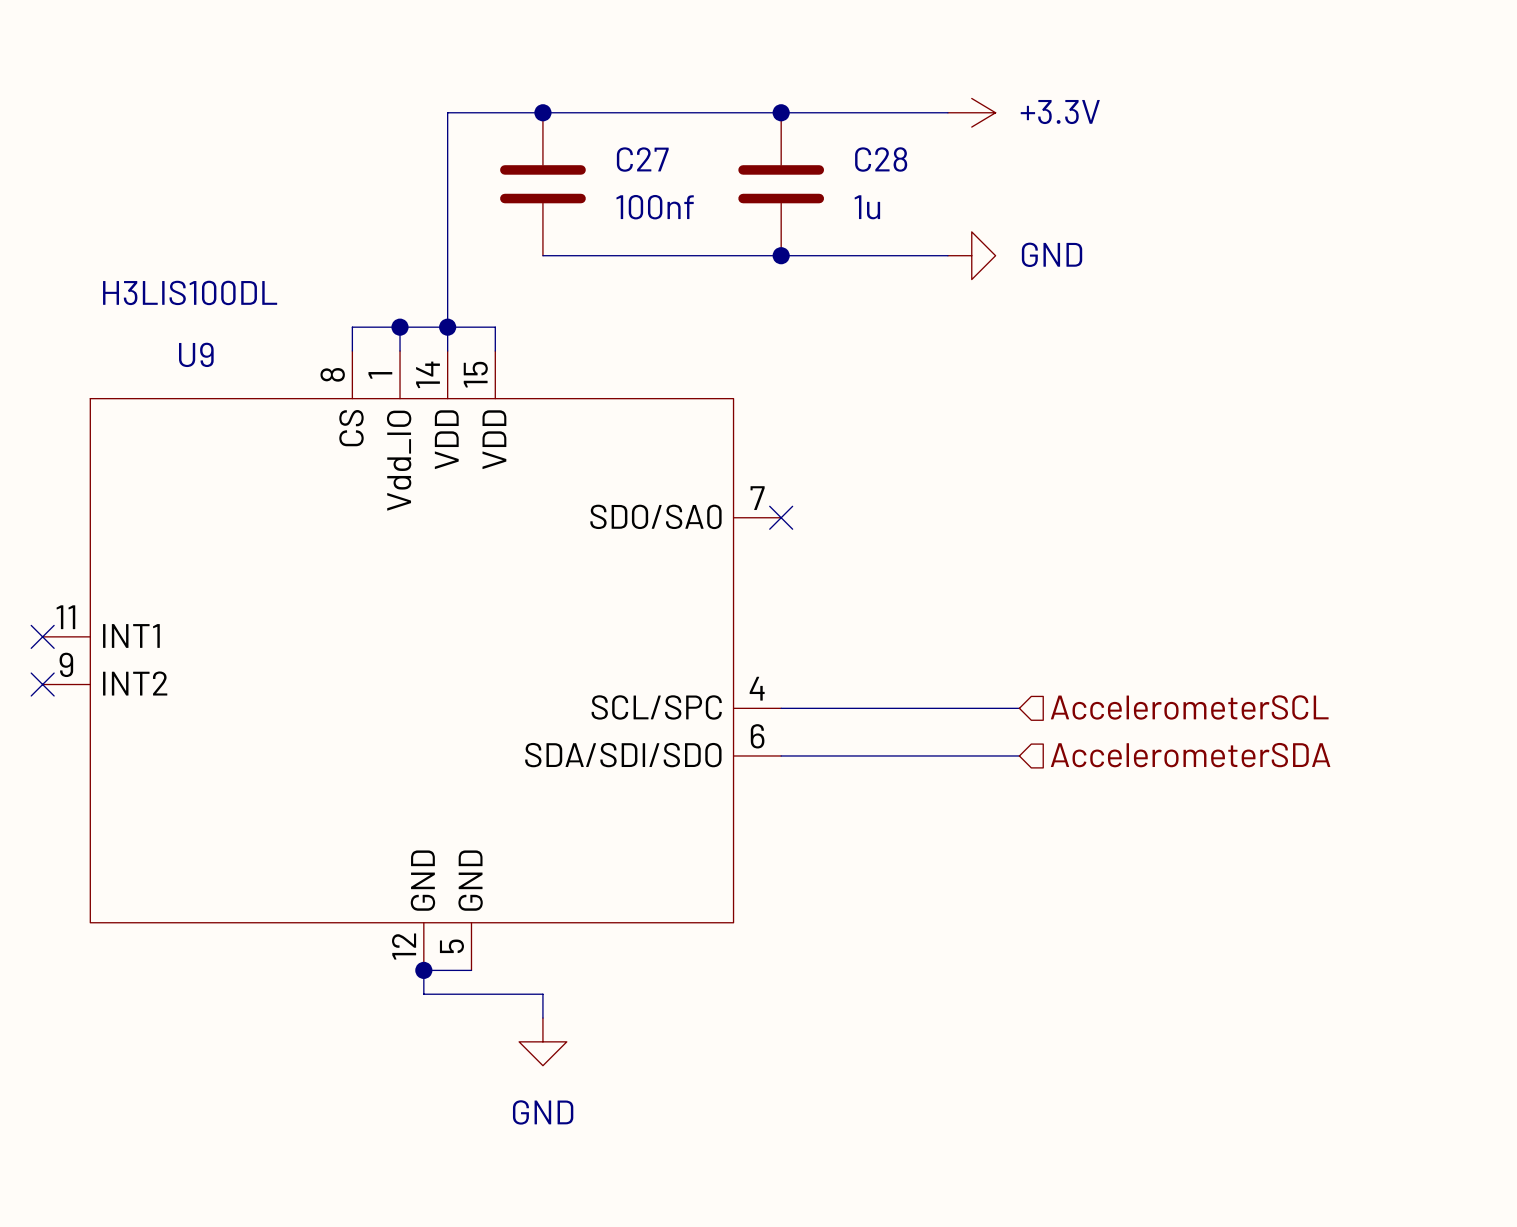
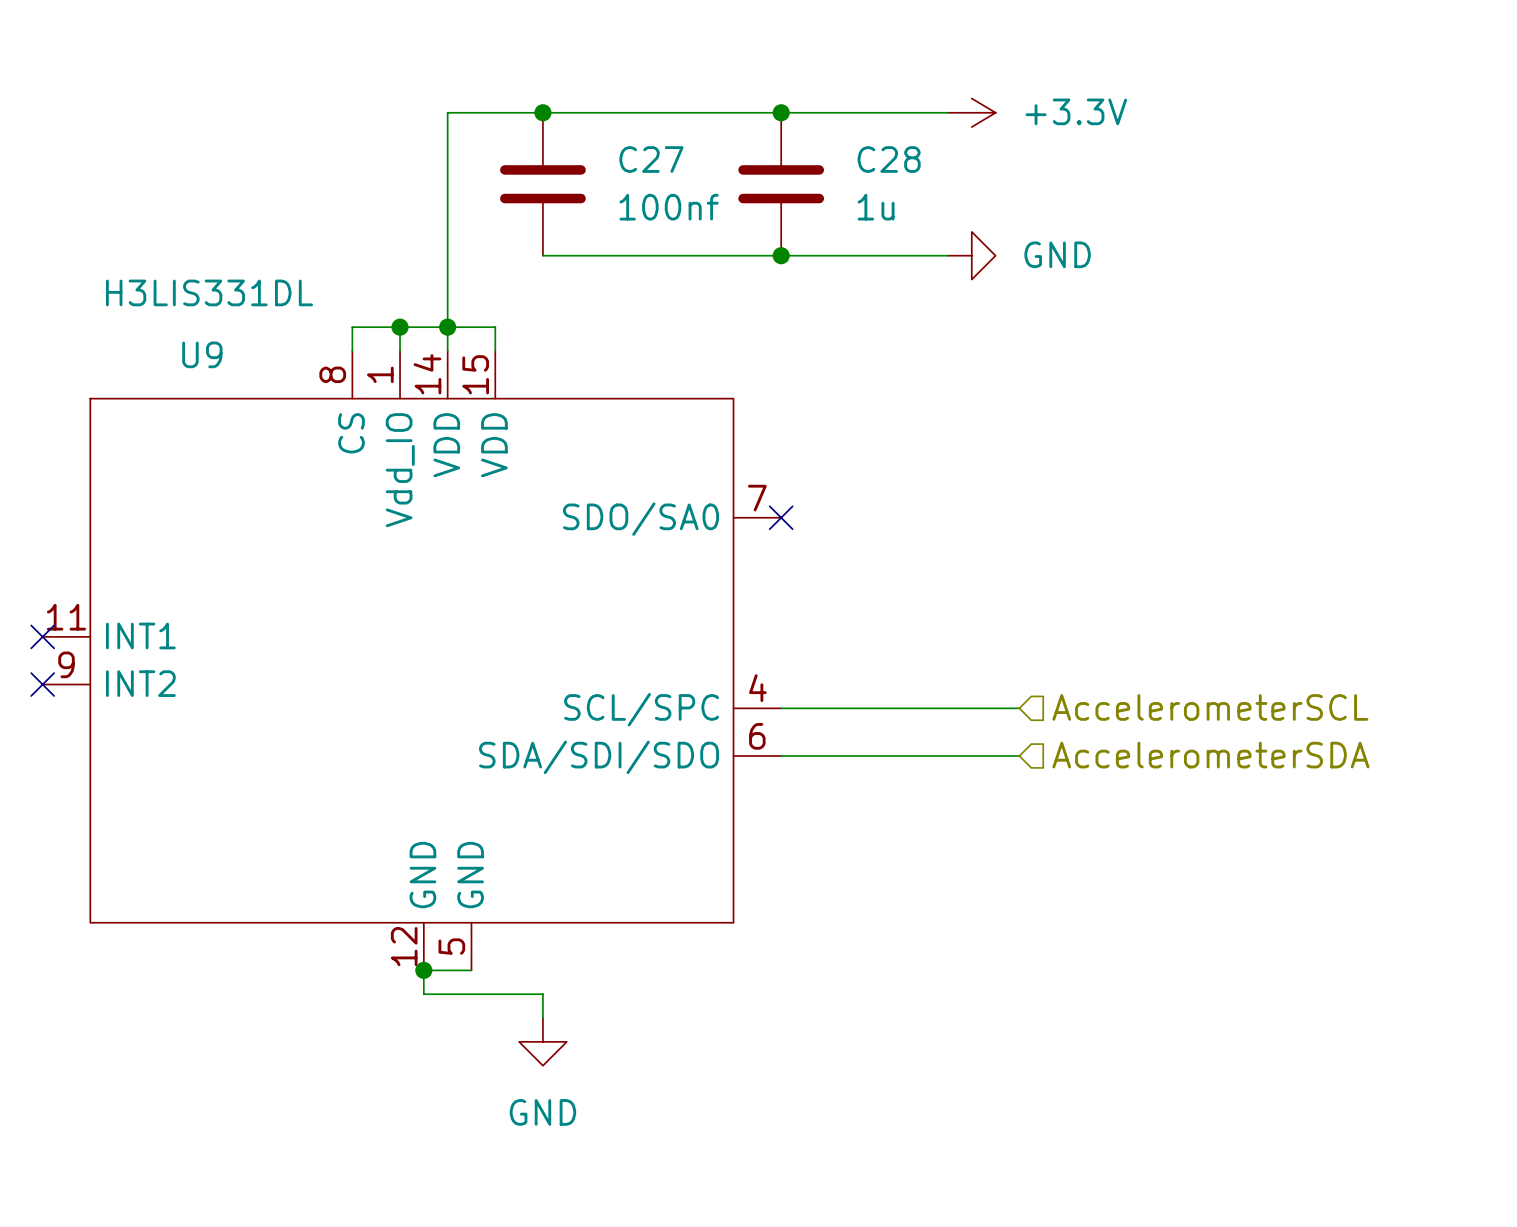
U9 value: H3LIS100DL (190, 292) -> H3LIS331DL (209, 292)

